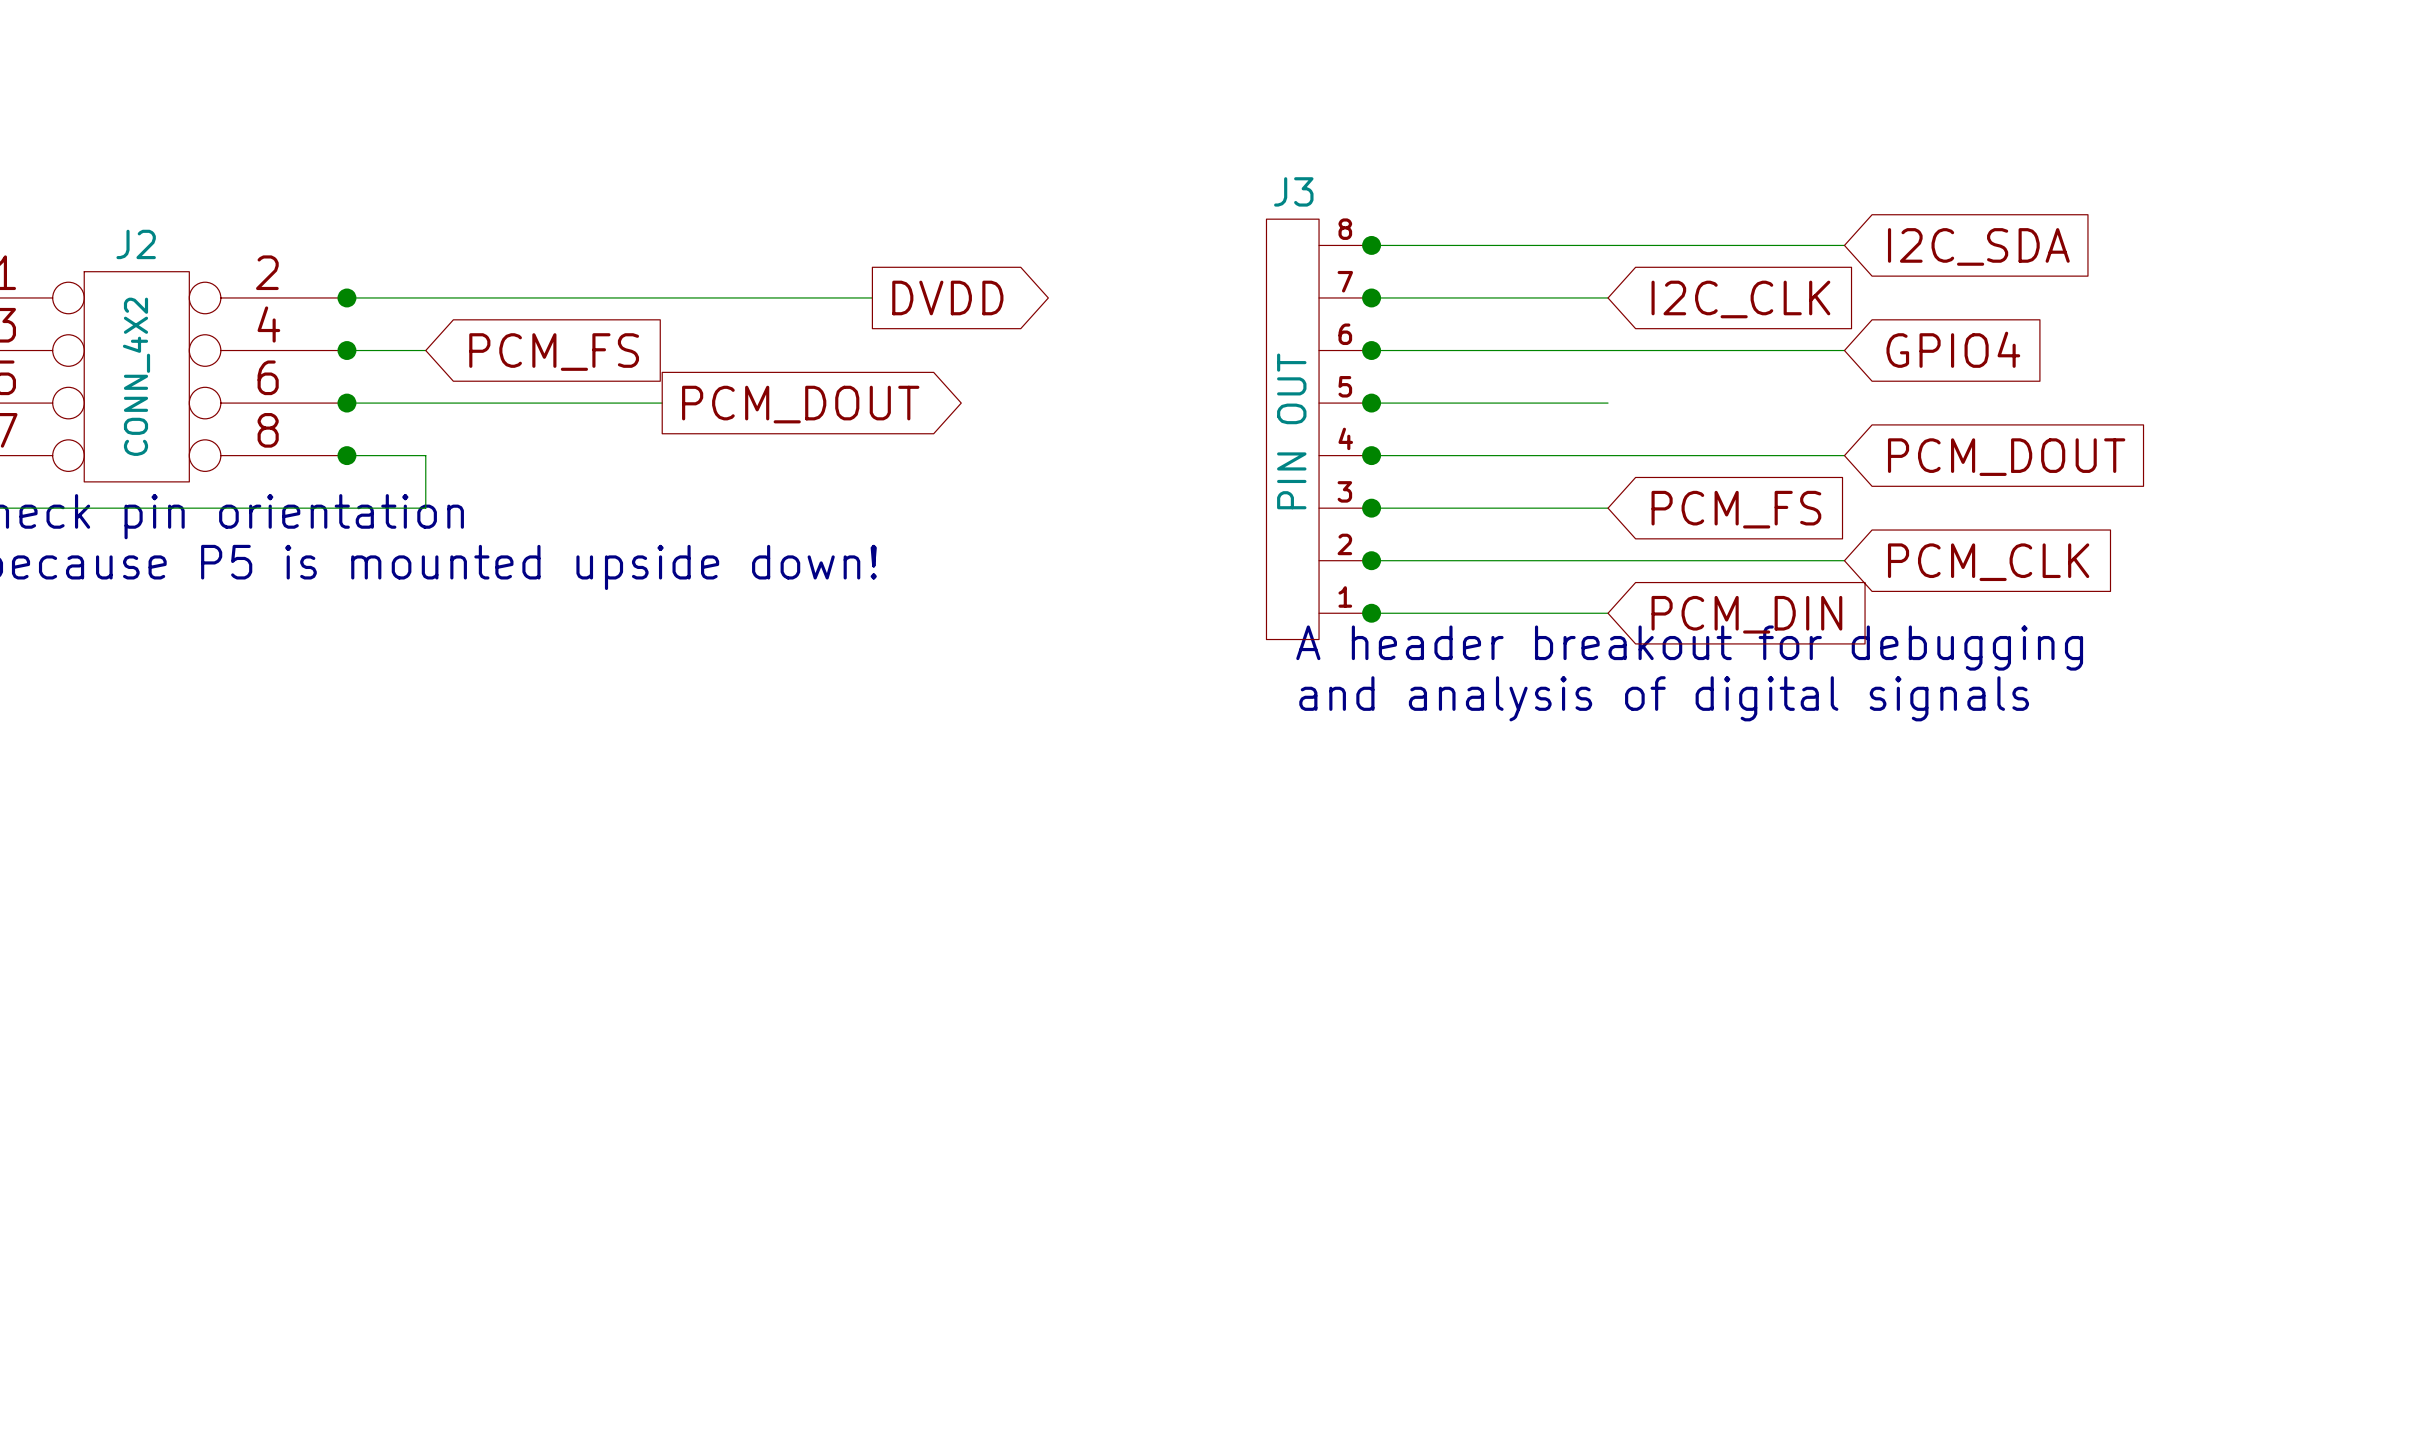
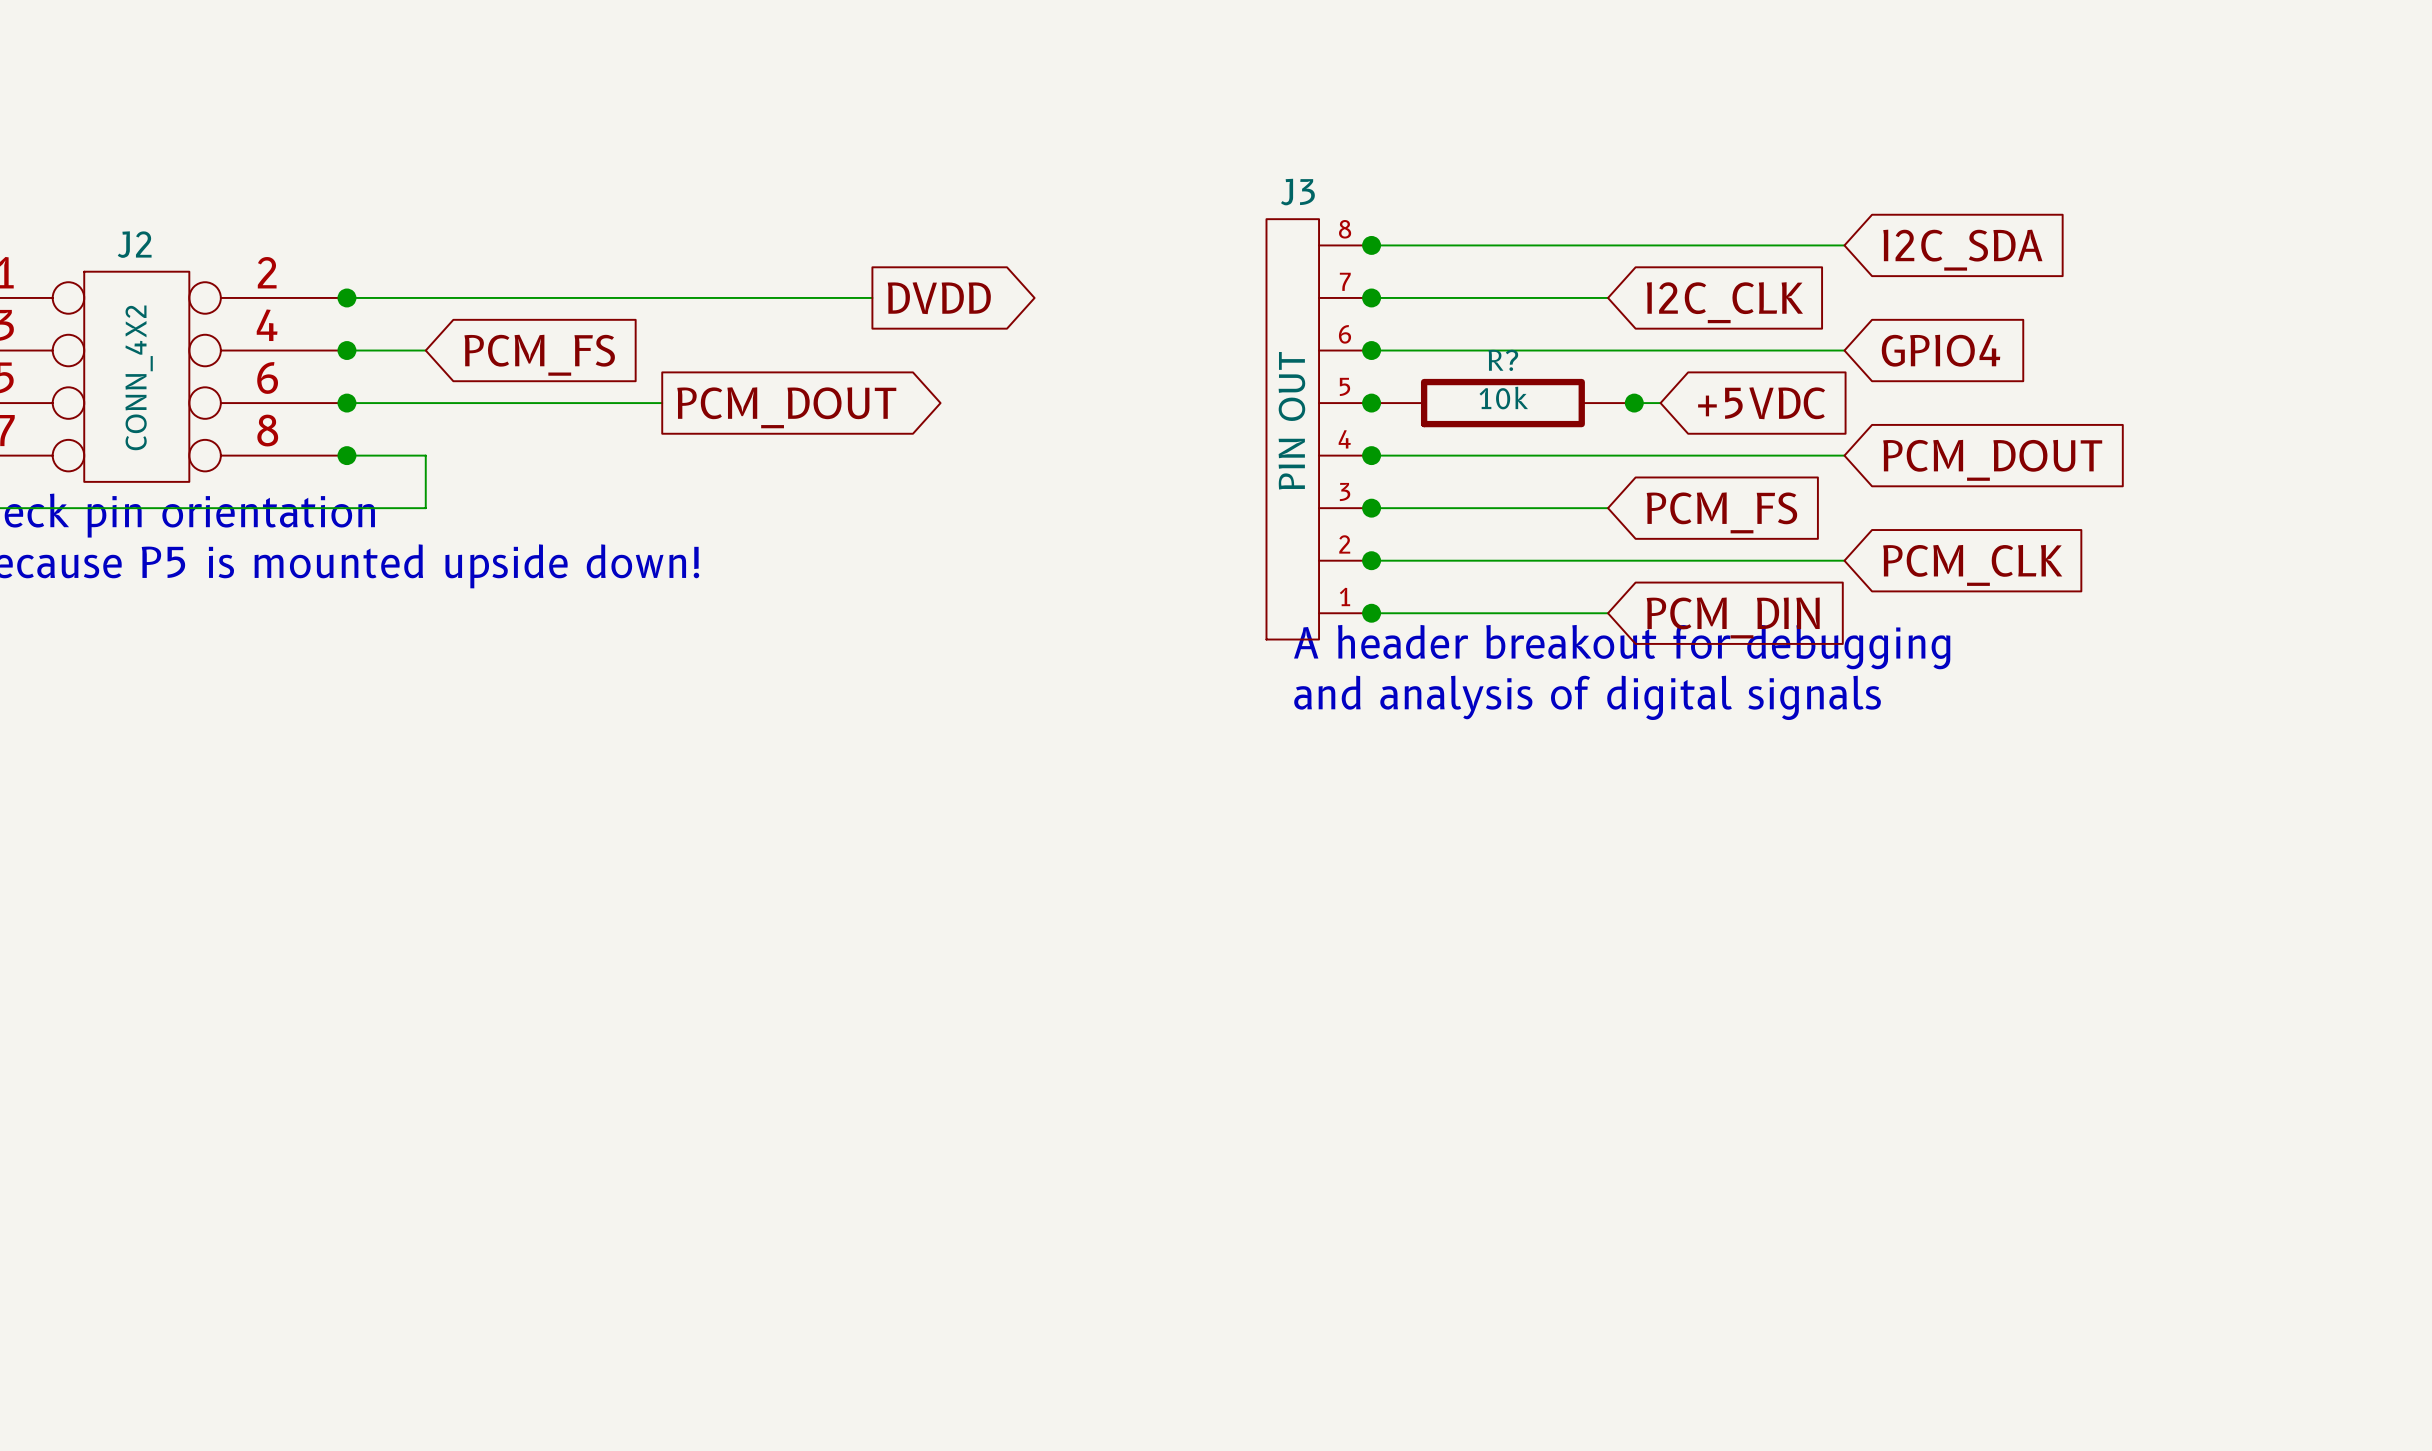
wire: (1371, 403) (1608, 403) -> none
R?: none -> 10k (1502, 403)
wire: none -> (1634, 403) (1660, 403)
junction: none -> (1634, 403)
global label: none -> +5VDC (1761, 403)

